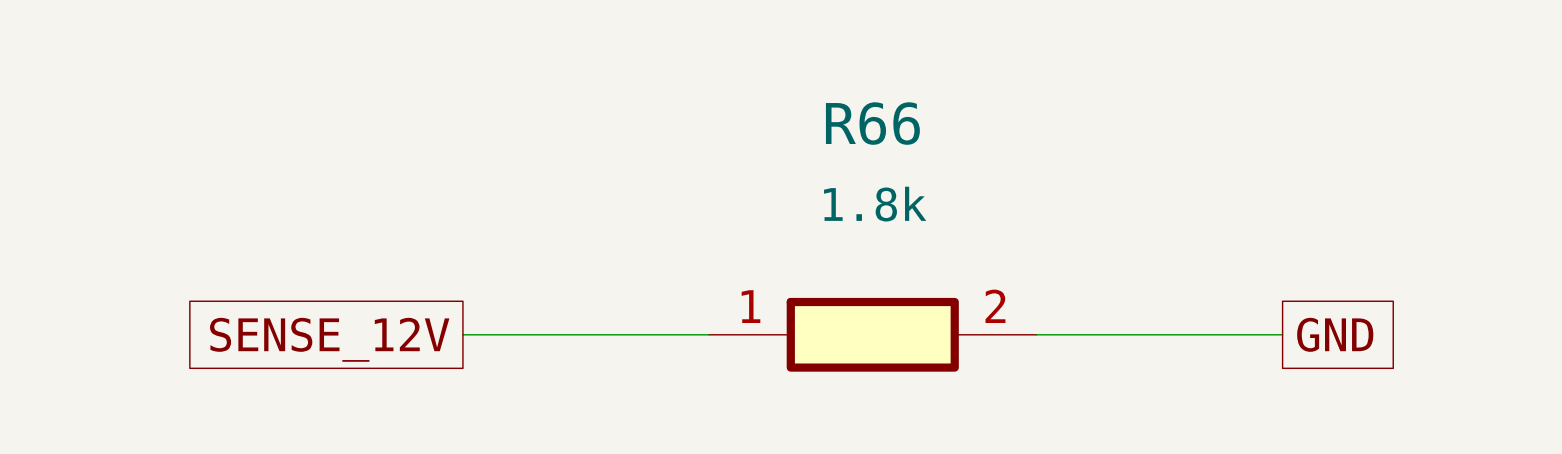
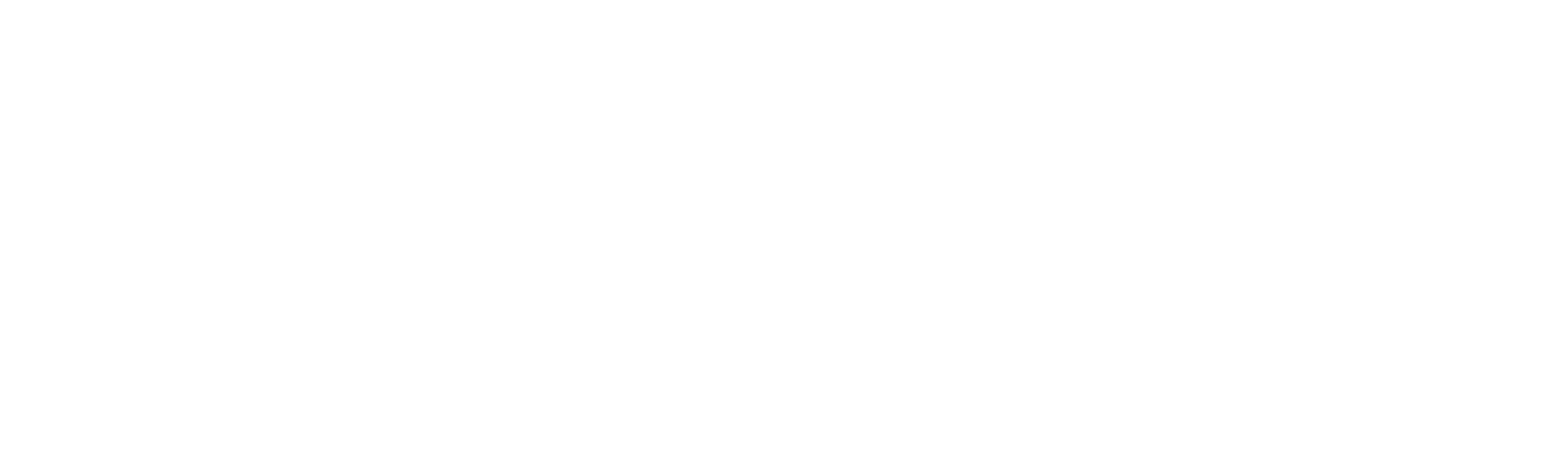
wire: (462, 334) (708, 334) -> none
R66: 1.8k (872, 334) -> none
wire: (1036, 334) (1282, 334) -> none
global label: GND (1335, 334) -> none
global label: SENSE_12V (329, 339) -> none

